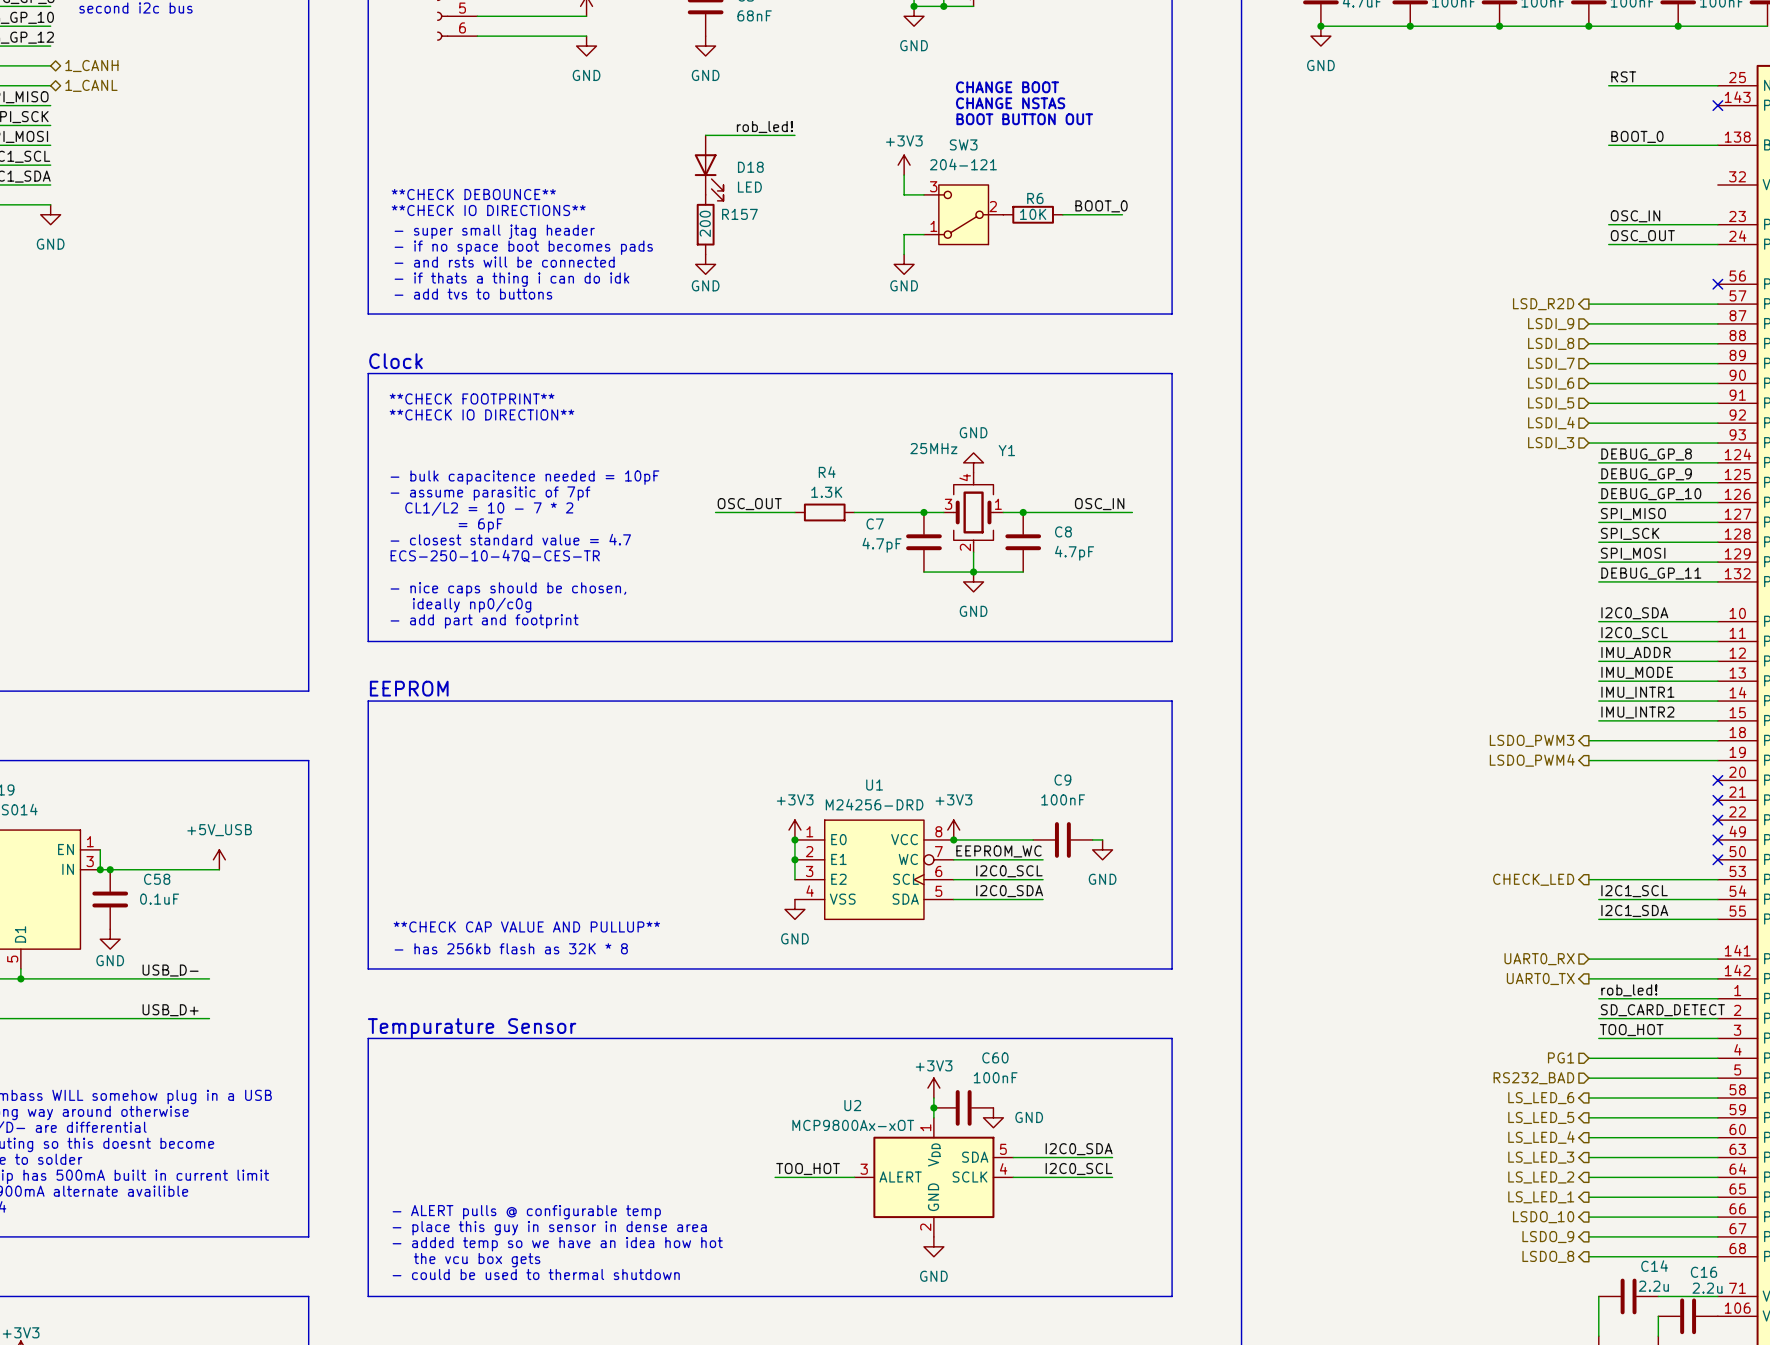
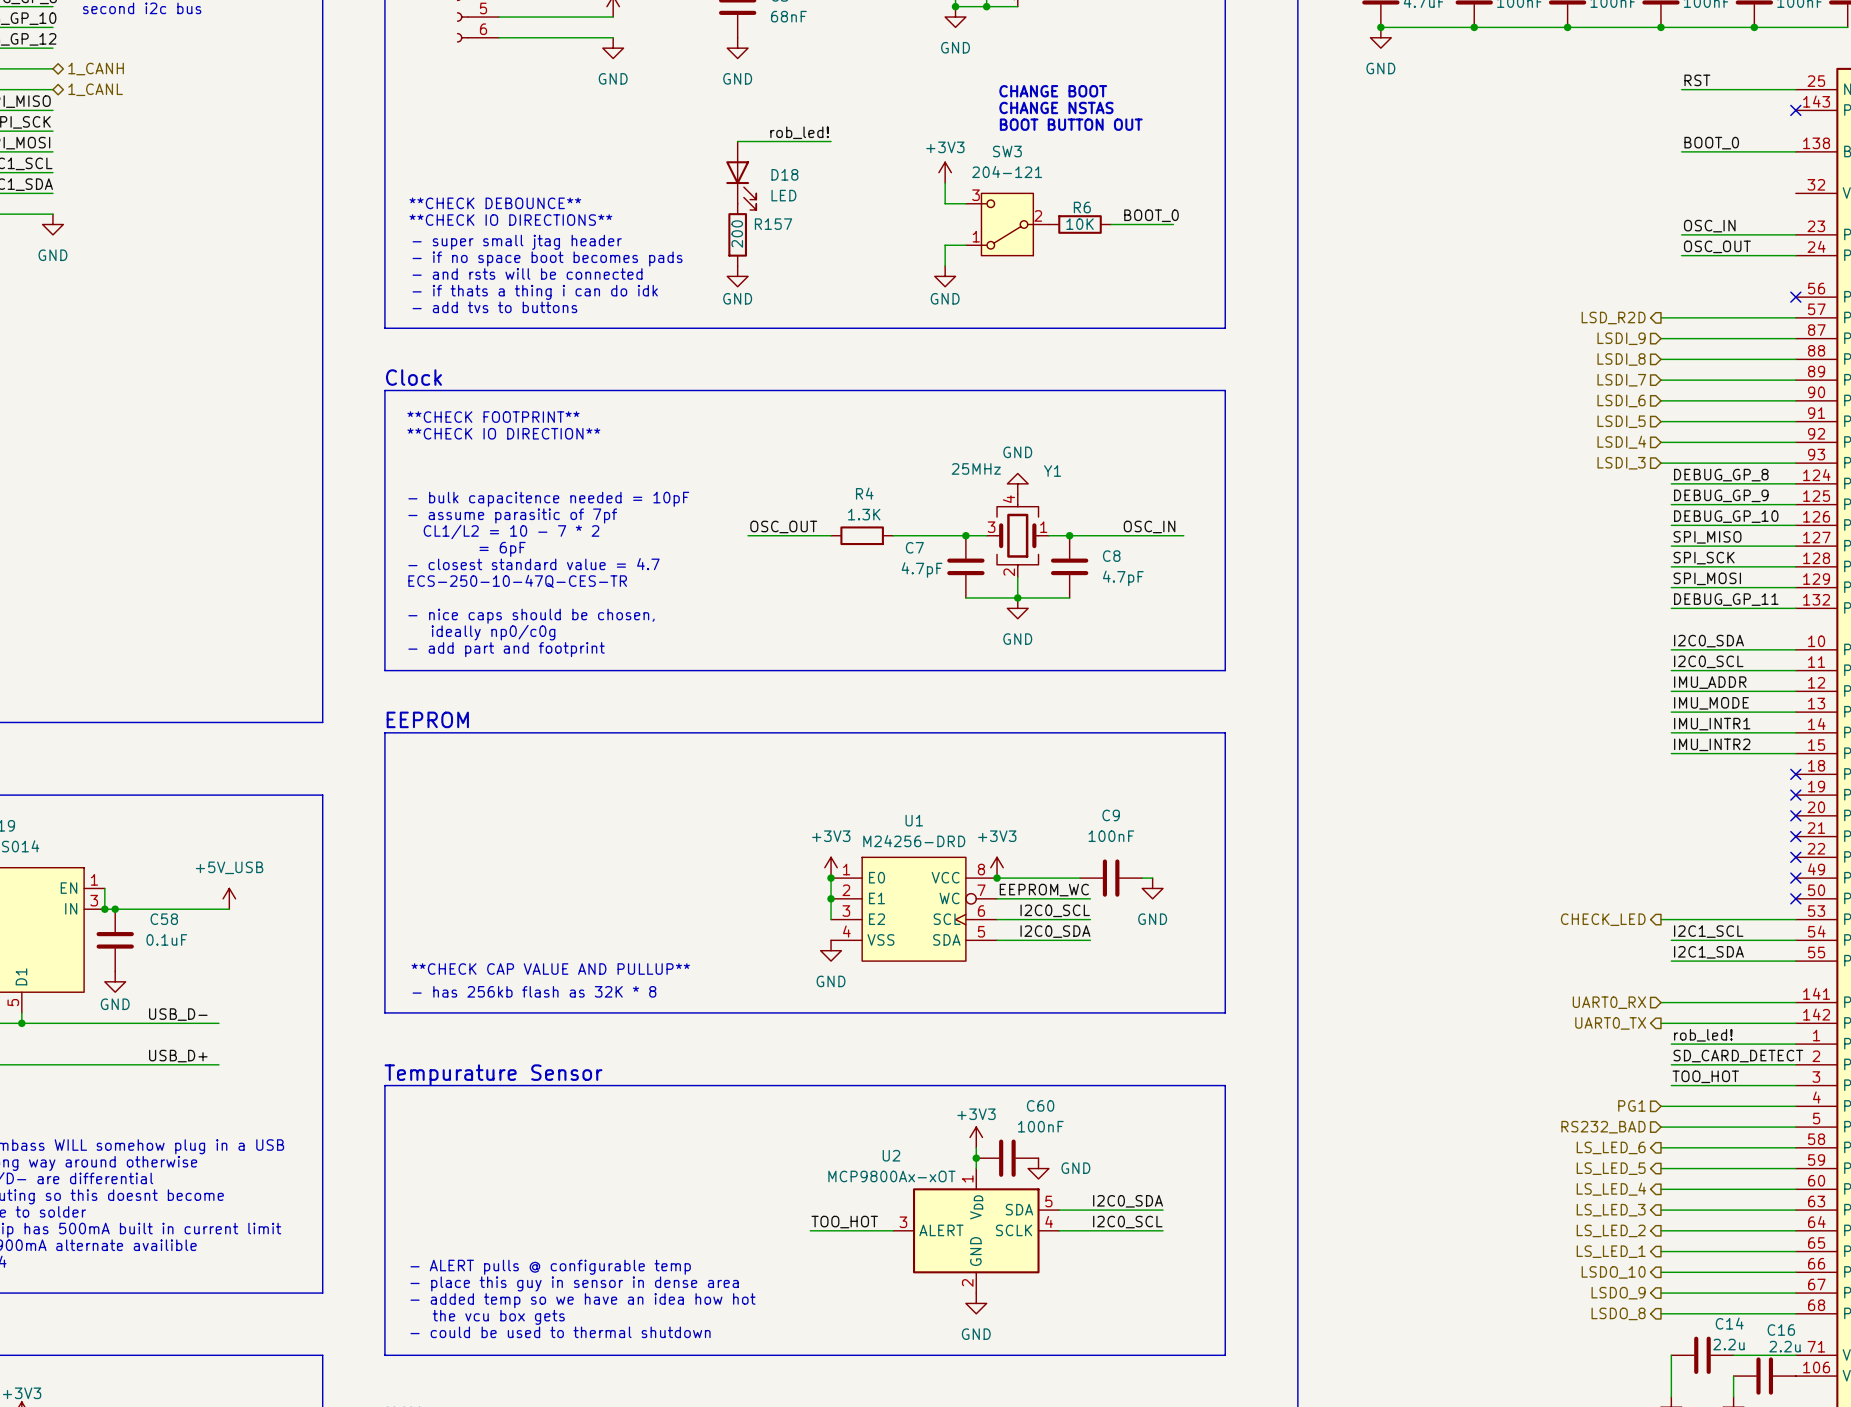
hierarchical label: LSDO_PWM3 (1532, 740) -> none
wire: (1588, 740) (1717, 740) -> none
no-connect mark: none -> (1795, 774)
hierarchical label: LSDO_PWM4 (1532, 760) -> none
wire: (1588, 760) (1717, 760) -> none
no-connect mark: none -> (1795, 795)

